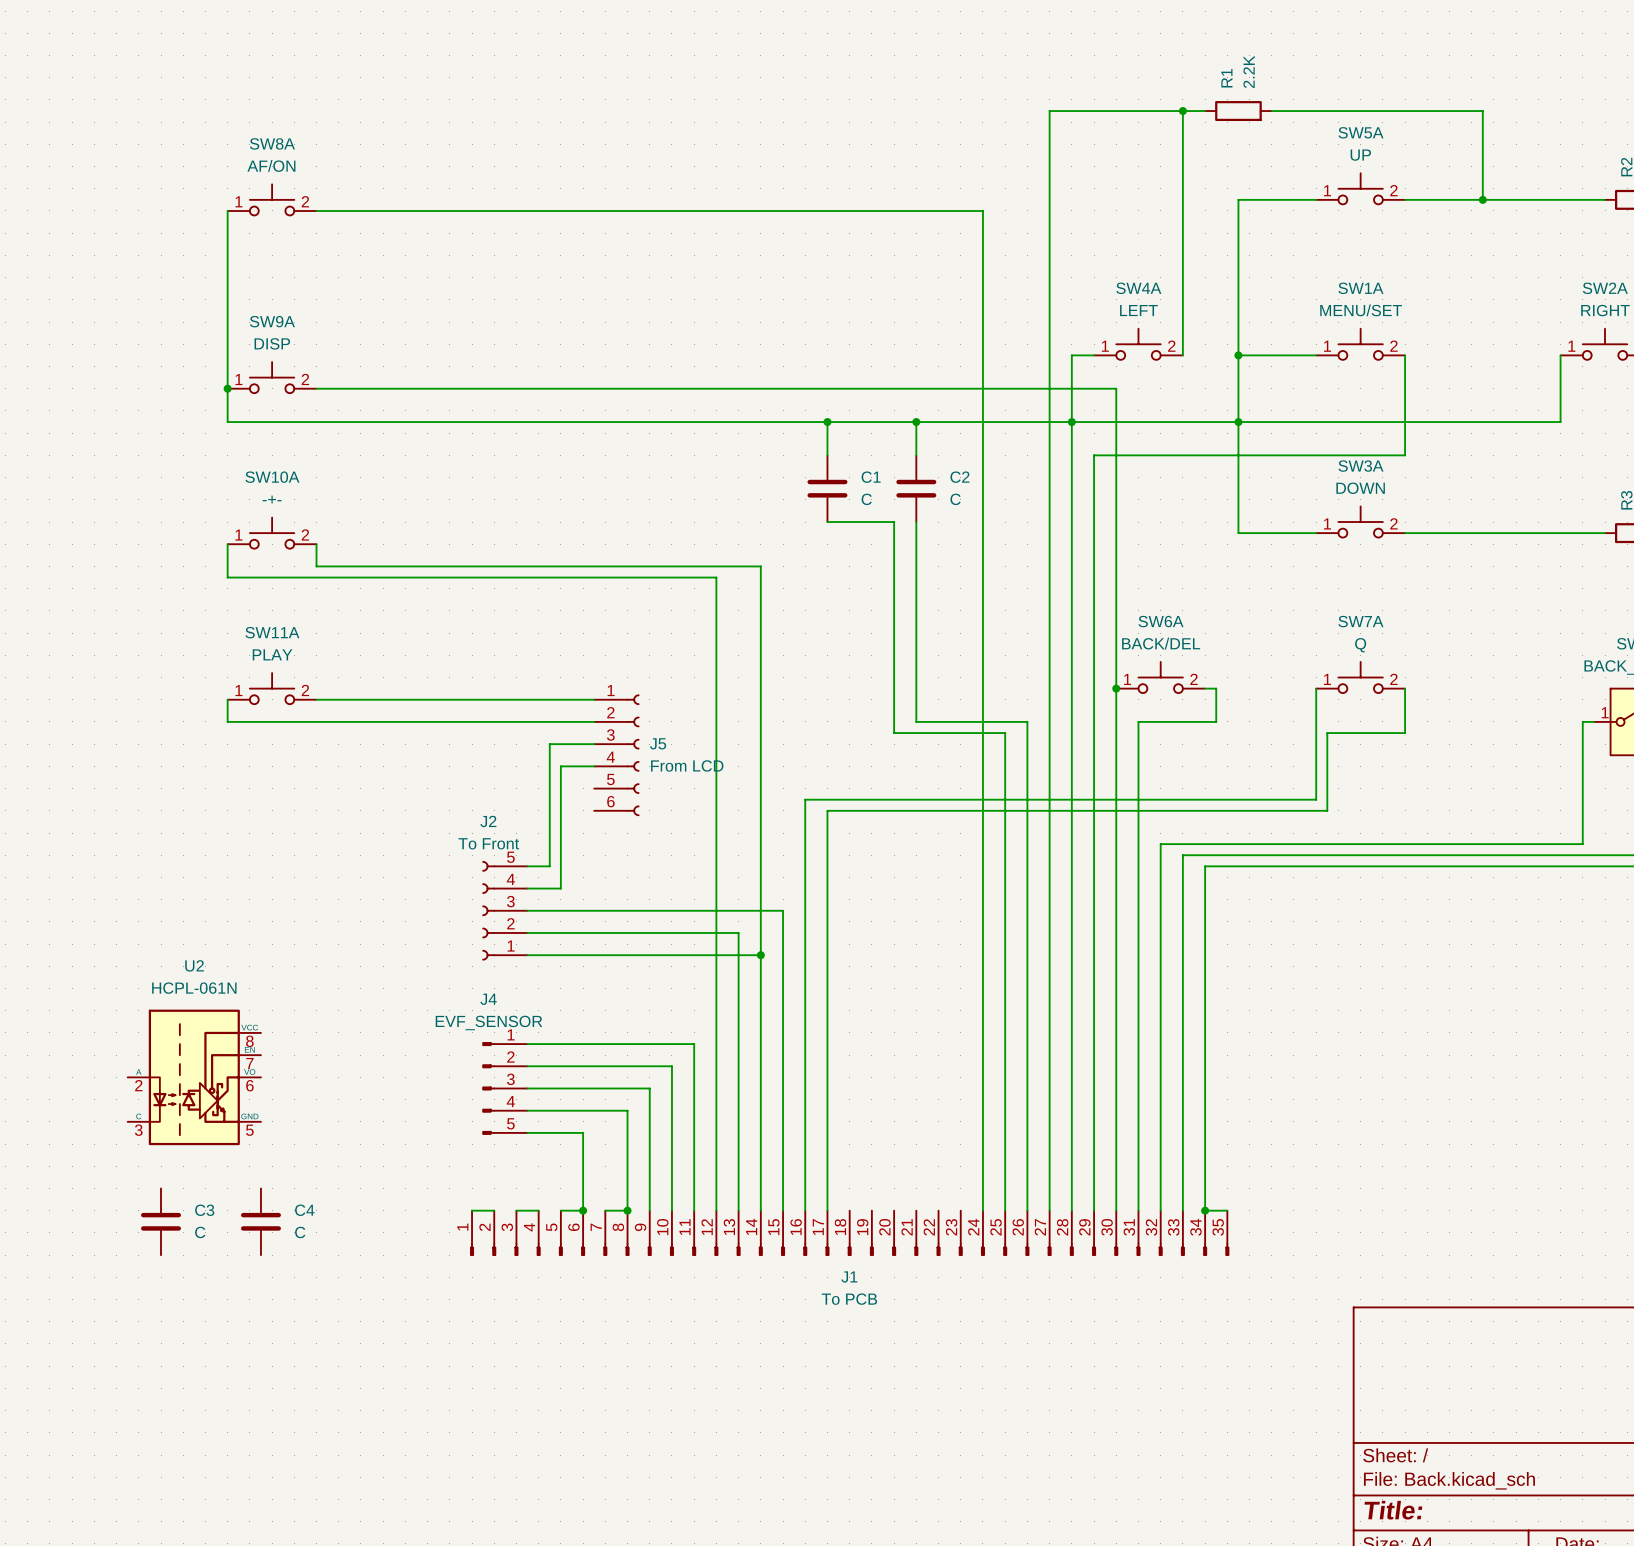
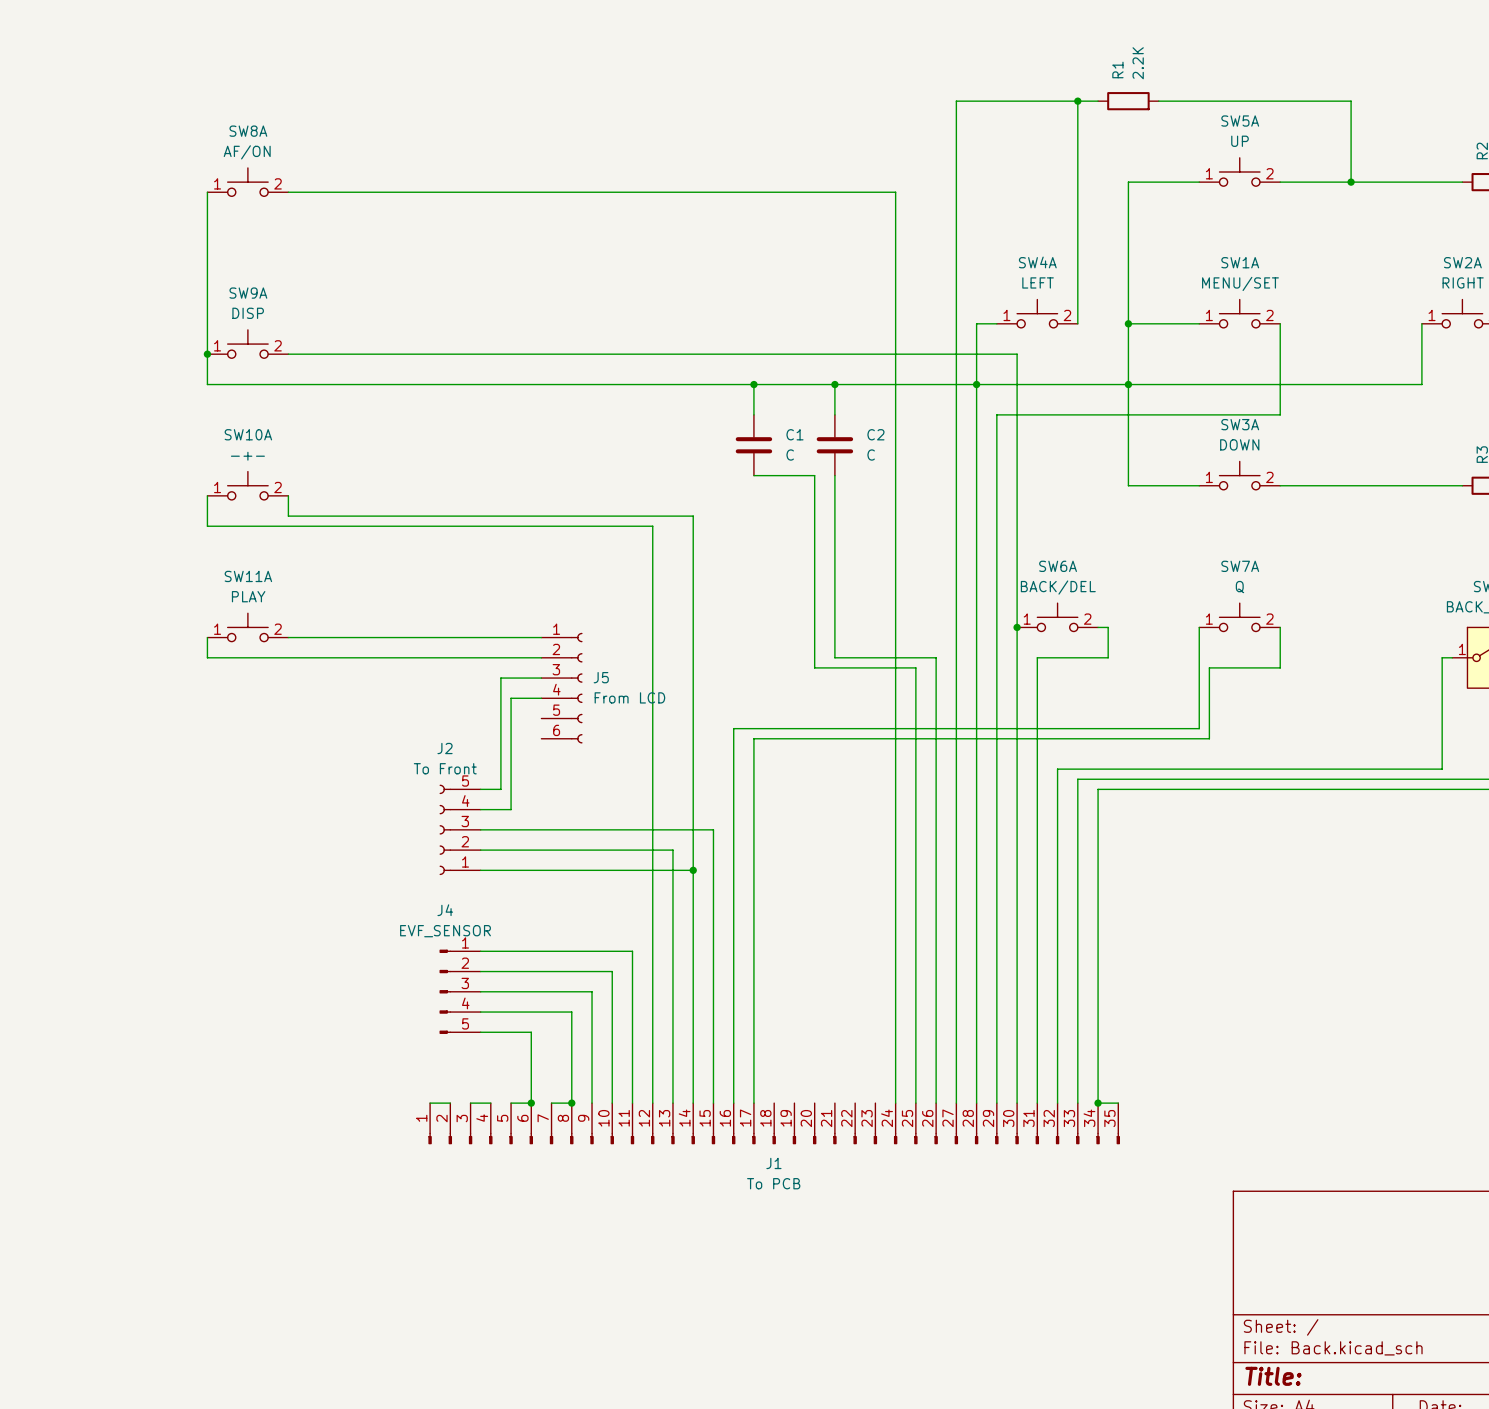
U2: HCPL-061N (194, 1077) -> none
C3: C (161, 1221) -> none
C4: C (260, 1221) -> none

